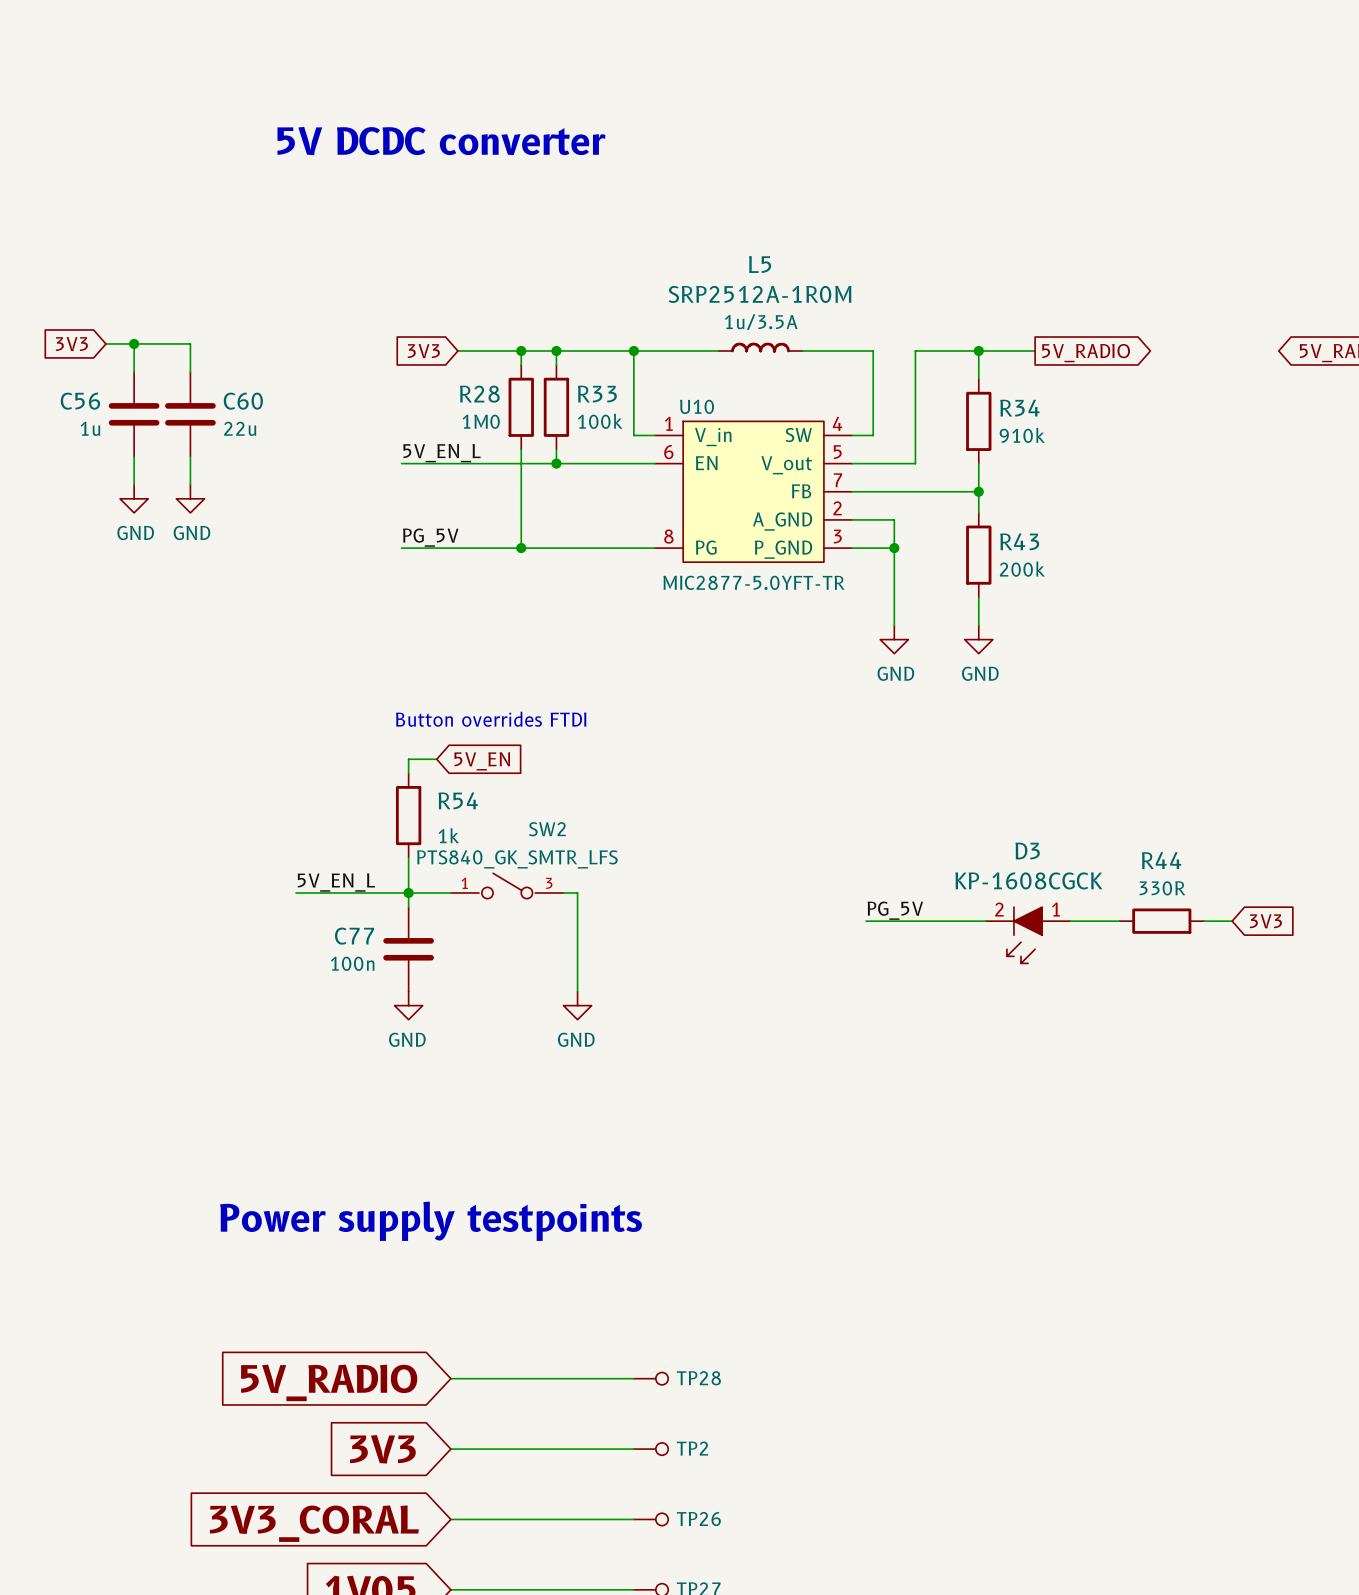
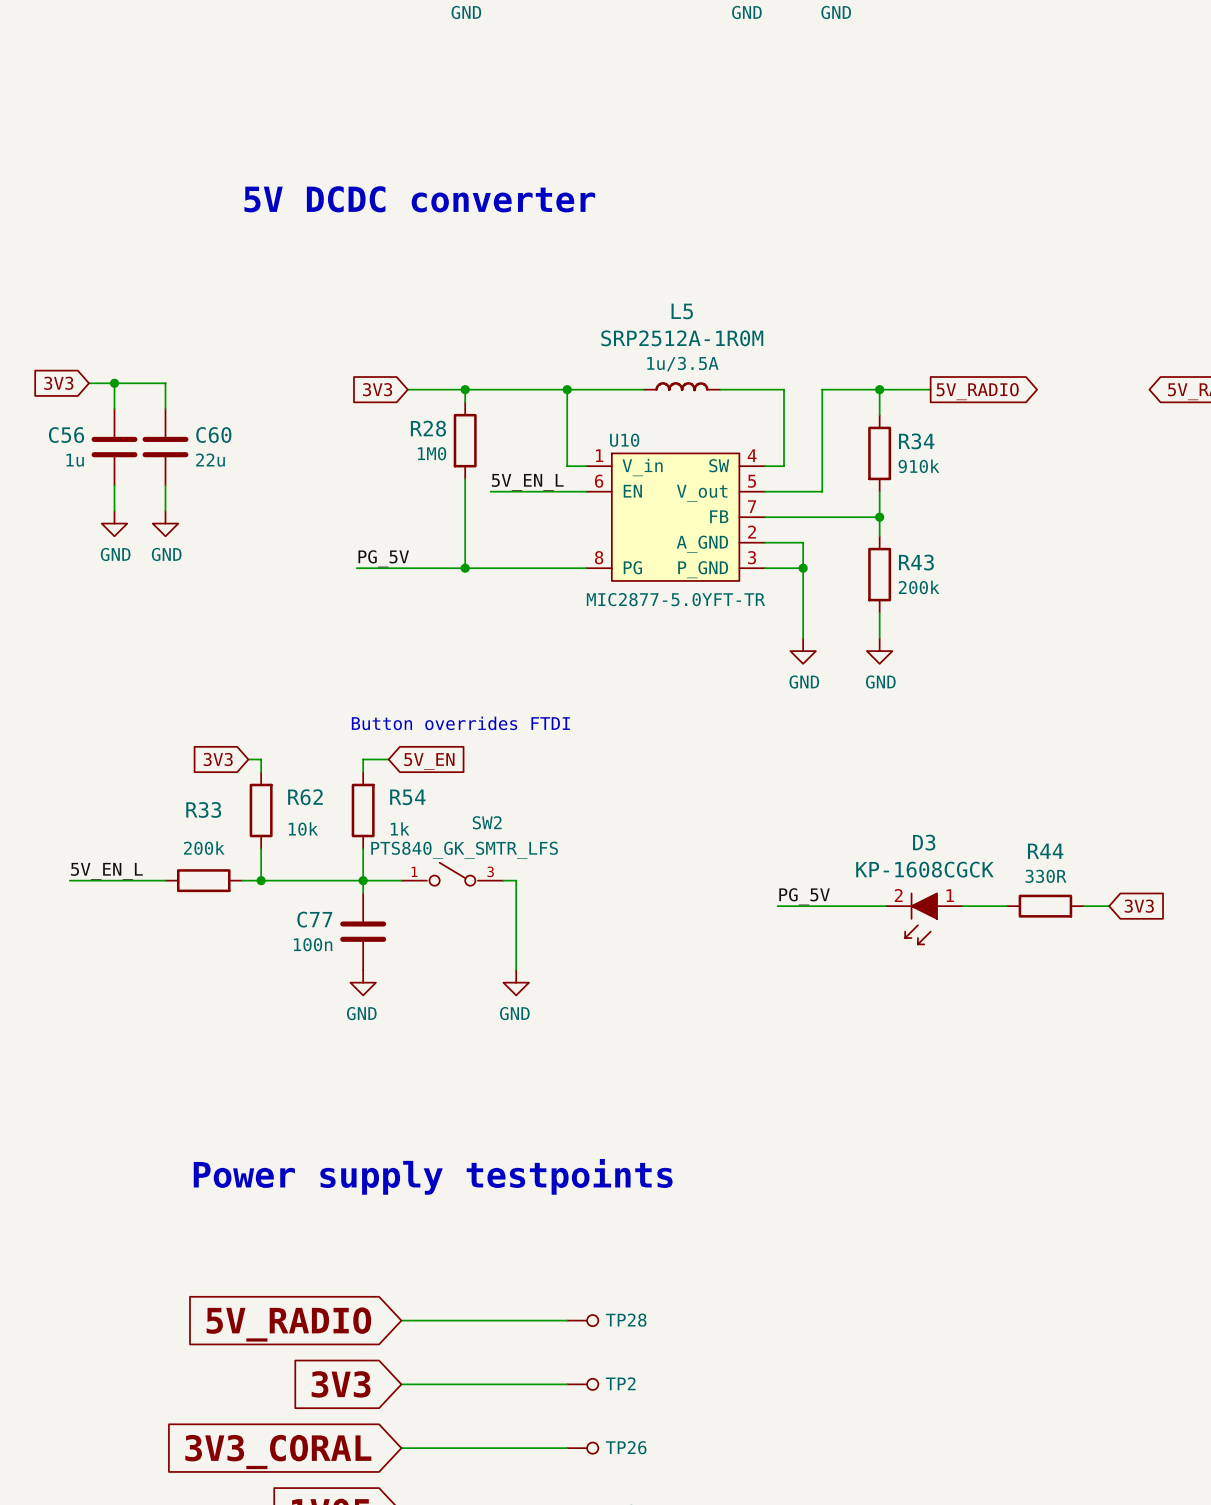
wire: (556, 351) (556, 365) -> none
junction: (556, 351) -> none
R33 name position: R33 (597, 394) -> R33 (203, 809)
R33 rotation: 0° (556, 407) -> 90° clockwise (203, 880)
R33 position: (556, 407) -> (203, 880)
R33 text: 100k (600, 421) -> 200k (204, 848)
wire: (556, 449) (556, 463) -> none
label position: 5V_EN_L (442, 453) -> 5V_EN_L (527, 482)
wire: (401, 463) (549, 463) -> none
junction: (556, 463) -> none
global label: none -> 3V3 (218, 759)
wire: none -> (248, 759) (261, 759) (261, 772)
R62: none -> (261, 810)
wire: none -> (261, 848) (261, 880) (242, 880)
label position: 5V_EN_L (336, 882) -> 5V_EN_L (106, 871)
wire: none -> (69, 880) (165, 880)
junction: none -> (261, 880)

